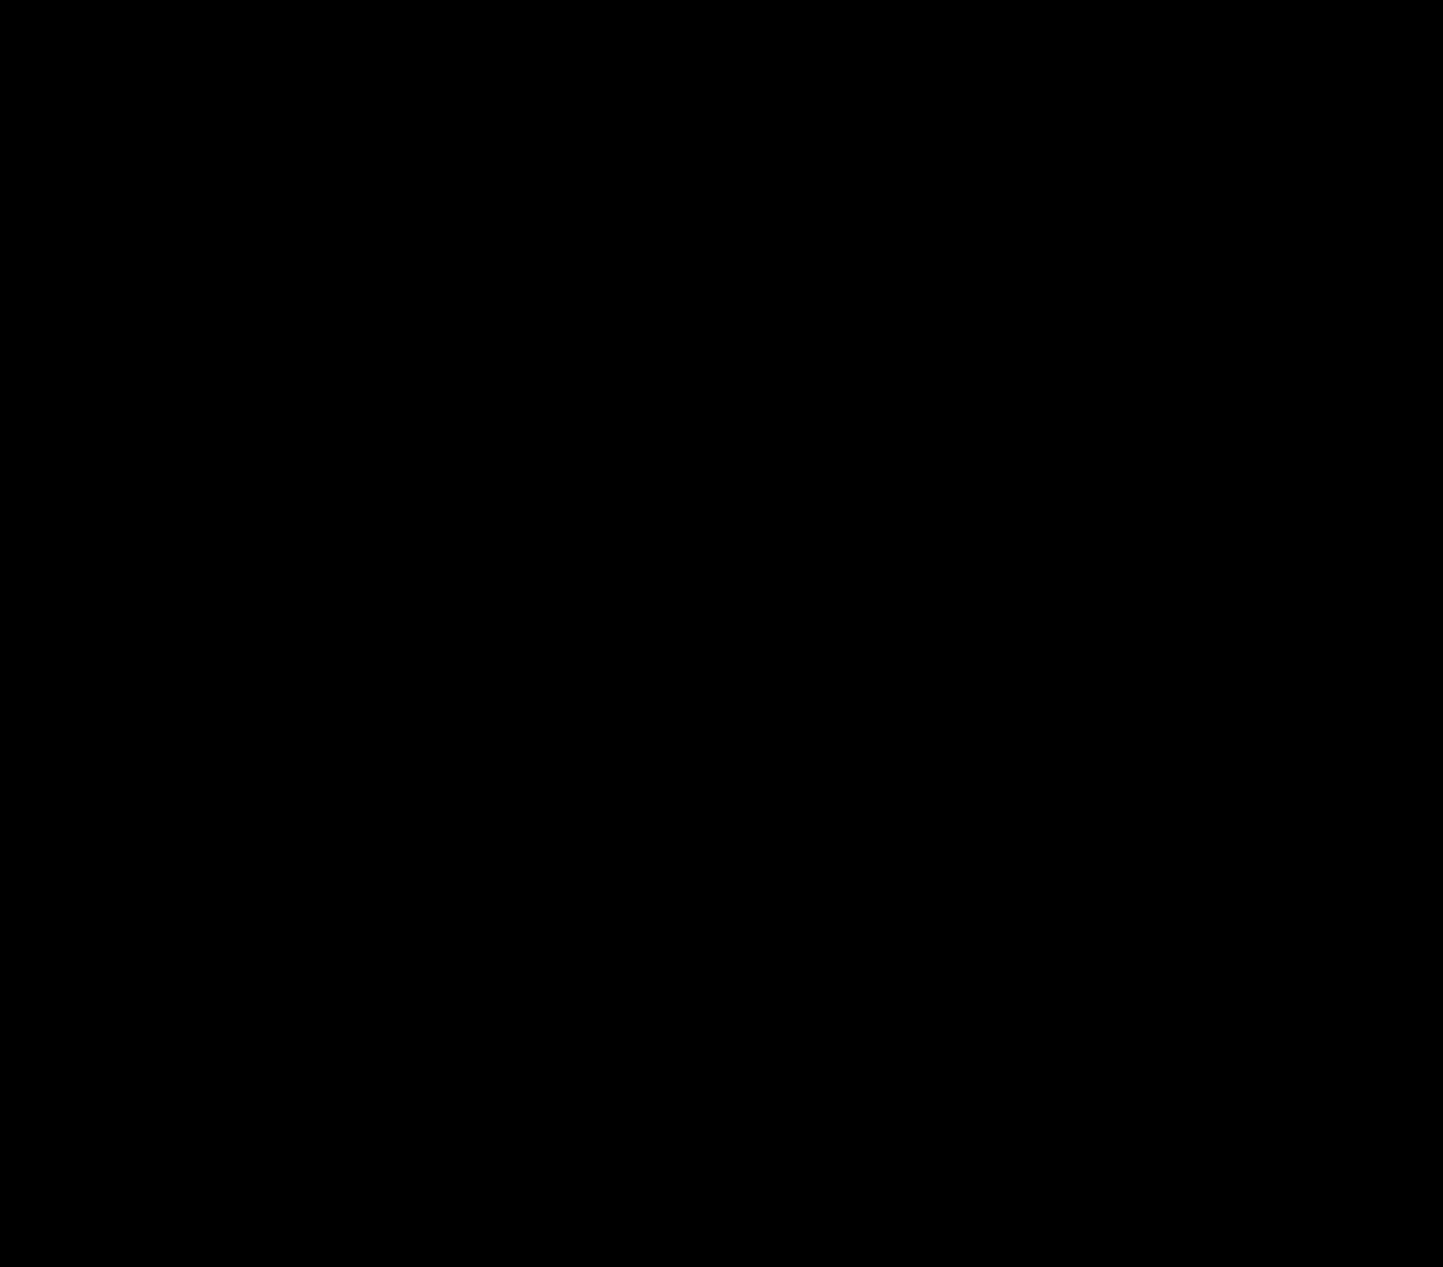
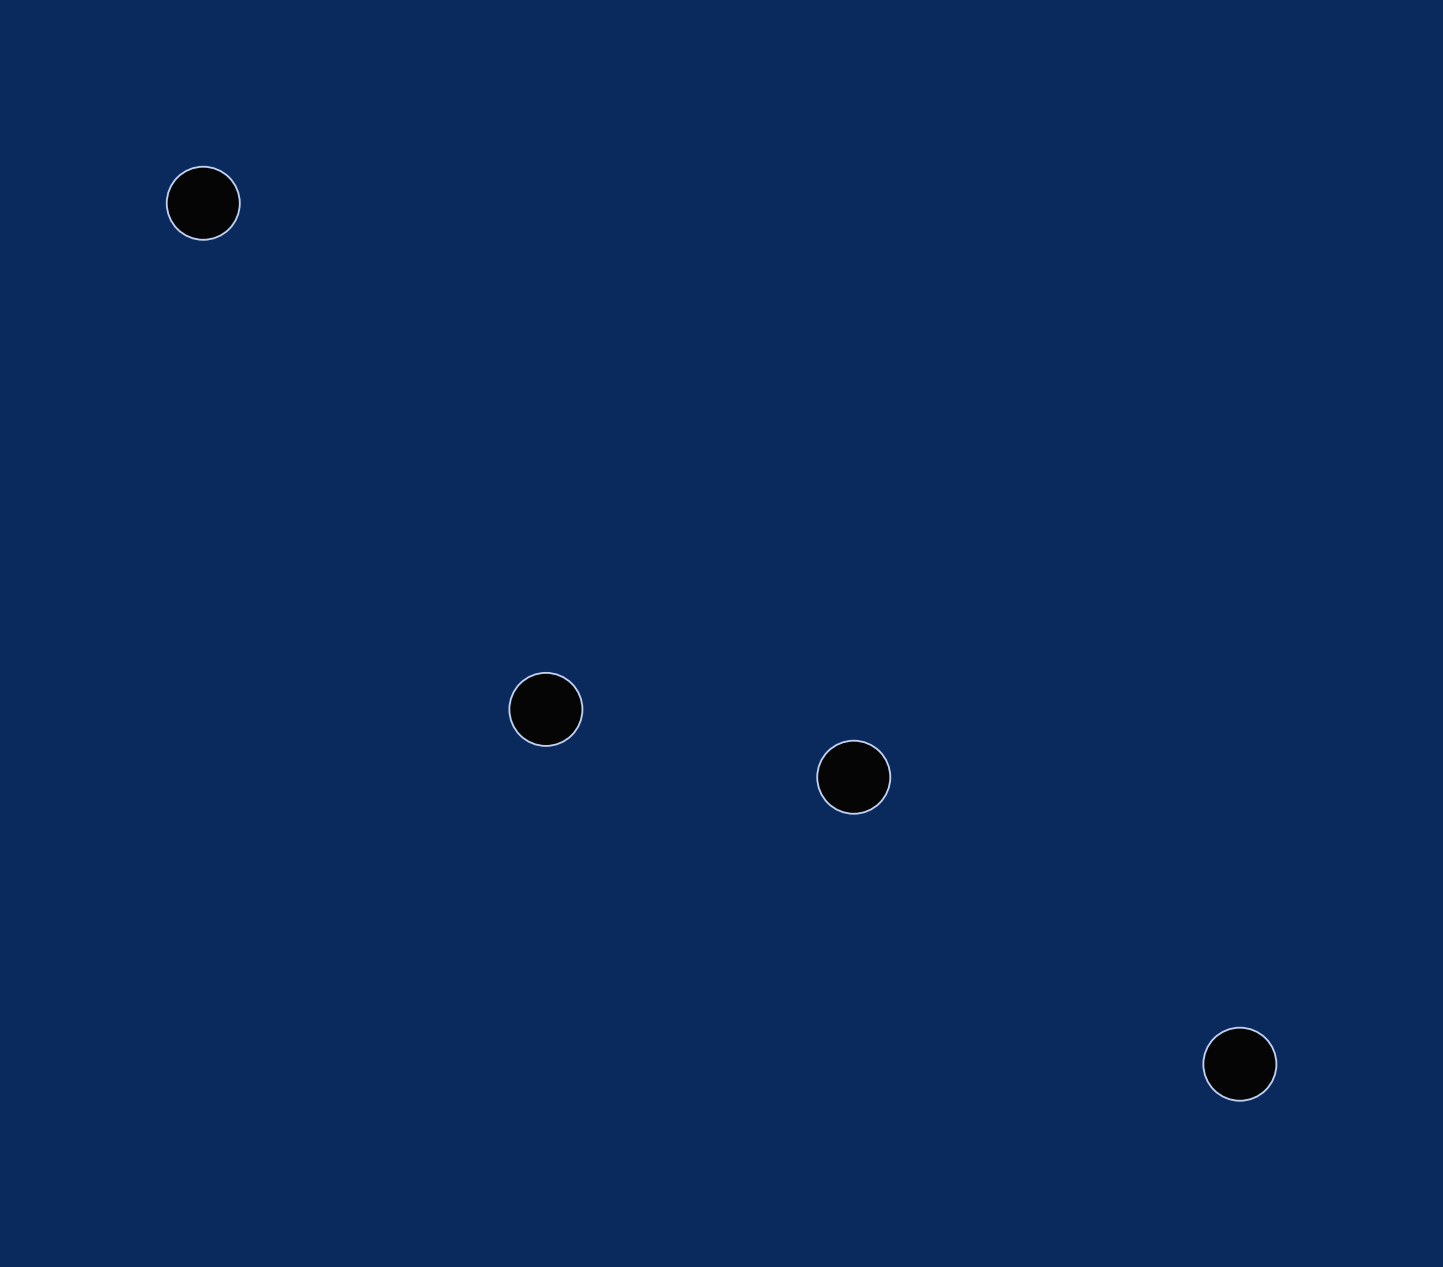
part: none -> (203, 203)
part: none -> (545, 709)
part: none -> (853, 777)
part: none -> (1239, 1064)

